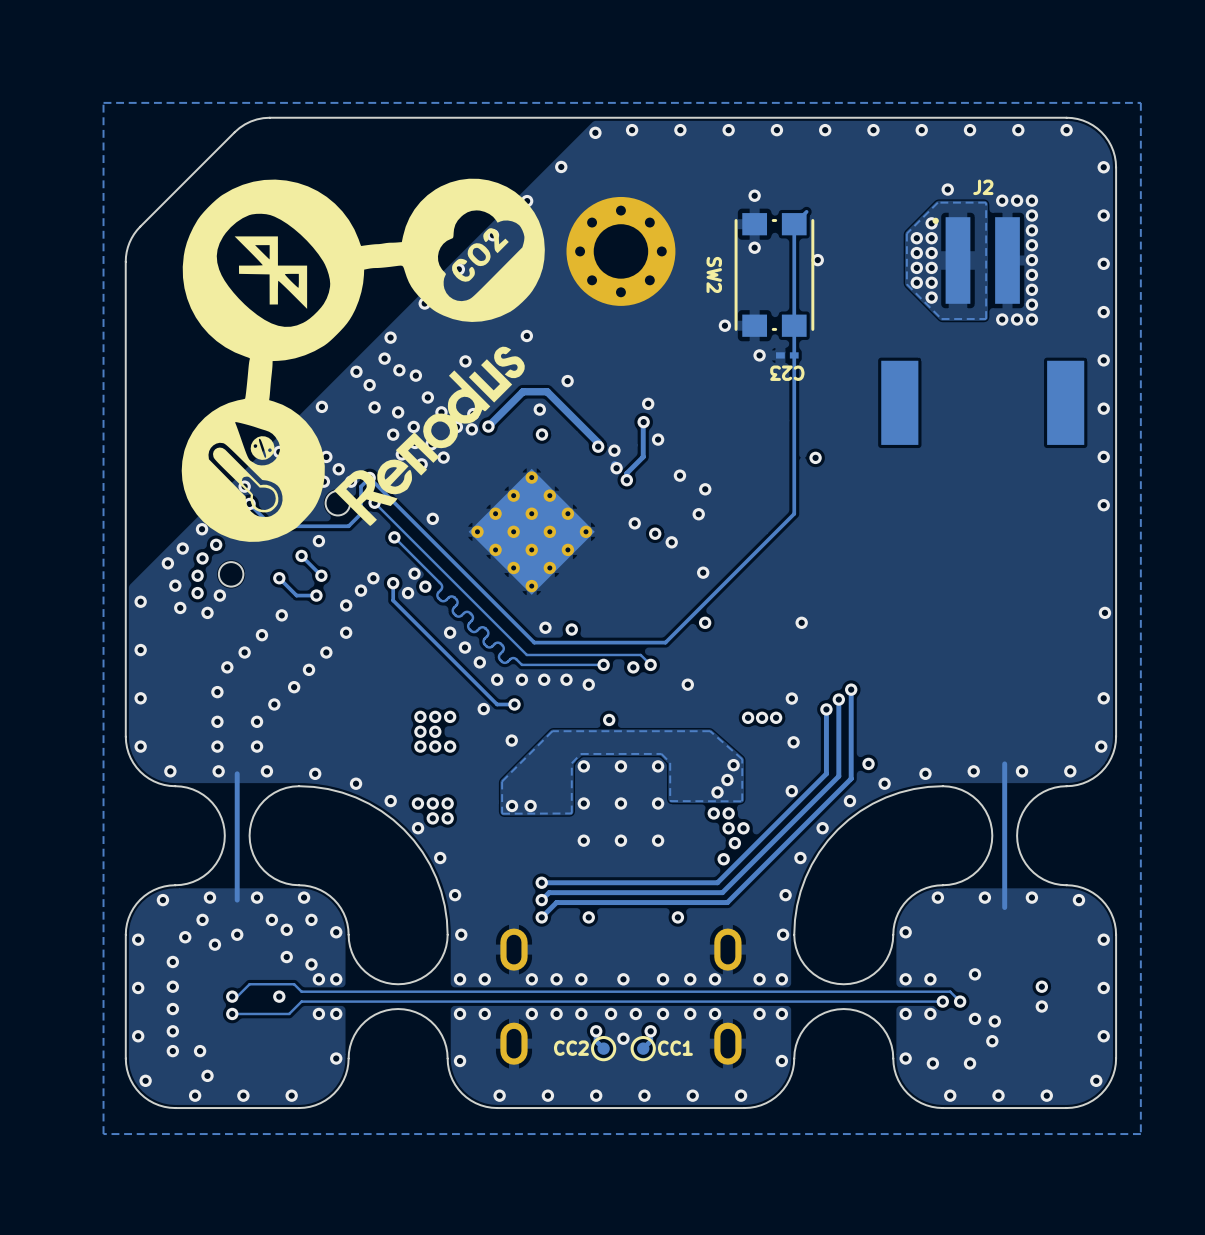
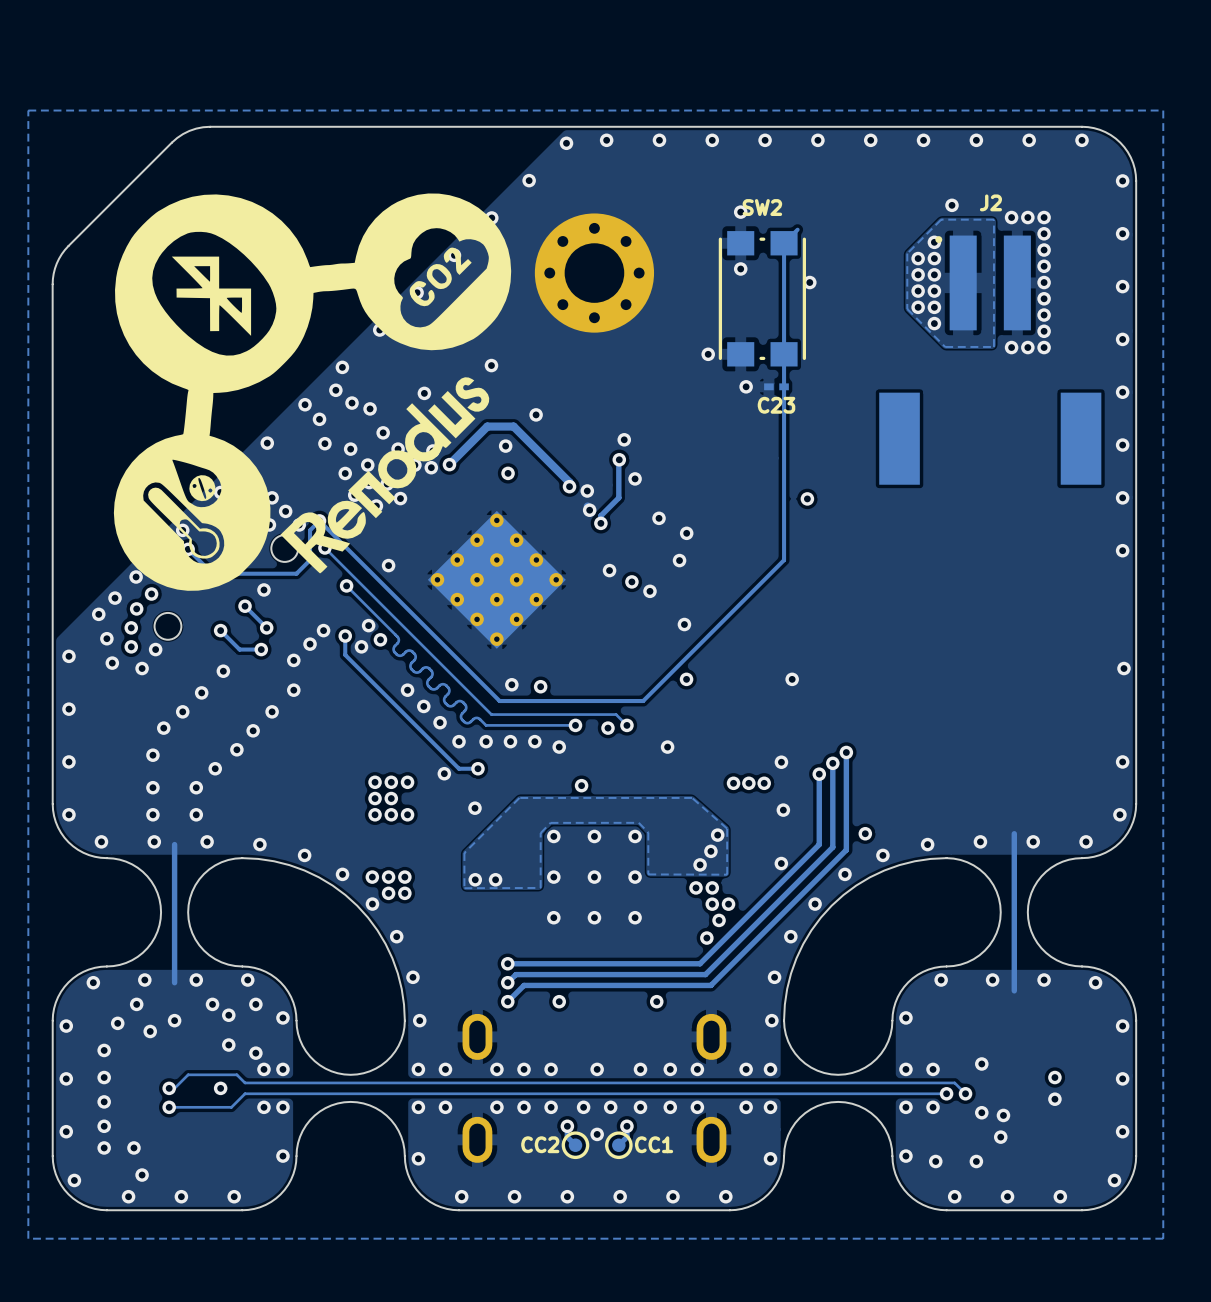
SW2 name rotation: 0° (714, 274) -> 90° counterclockwise (762, 207)
SW2 name position: SW2 (714, 274) -> SW2 (762, 207)
C23 name rotation: 0° (787, 373) -> 180° (776, 405)

